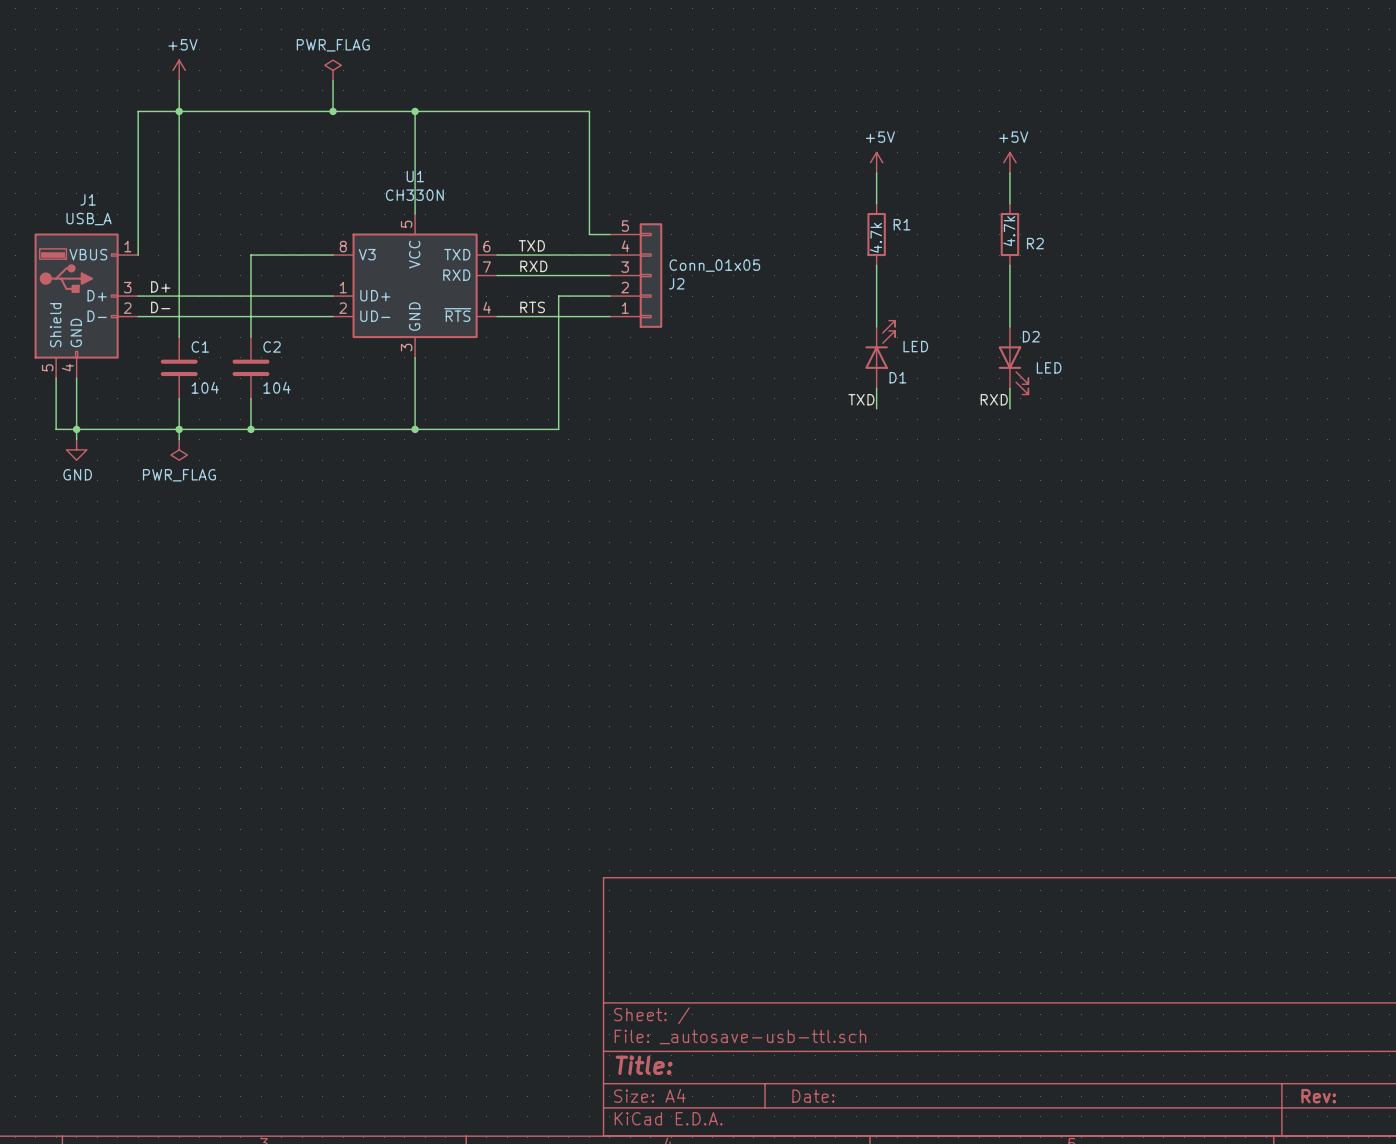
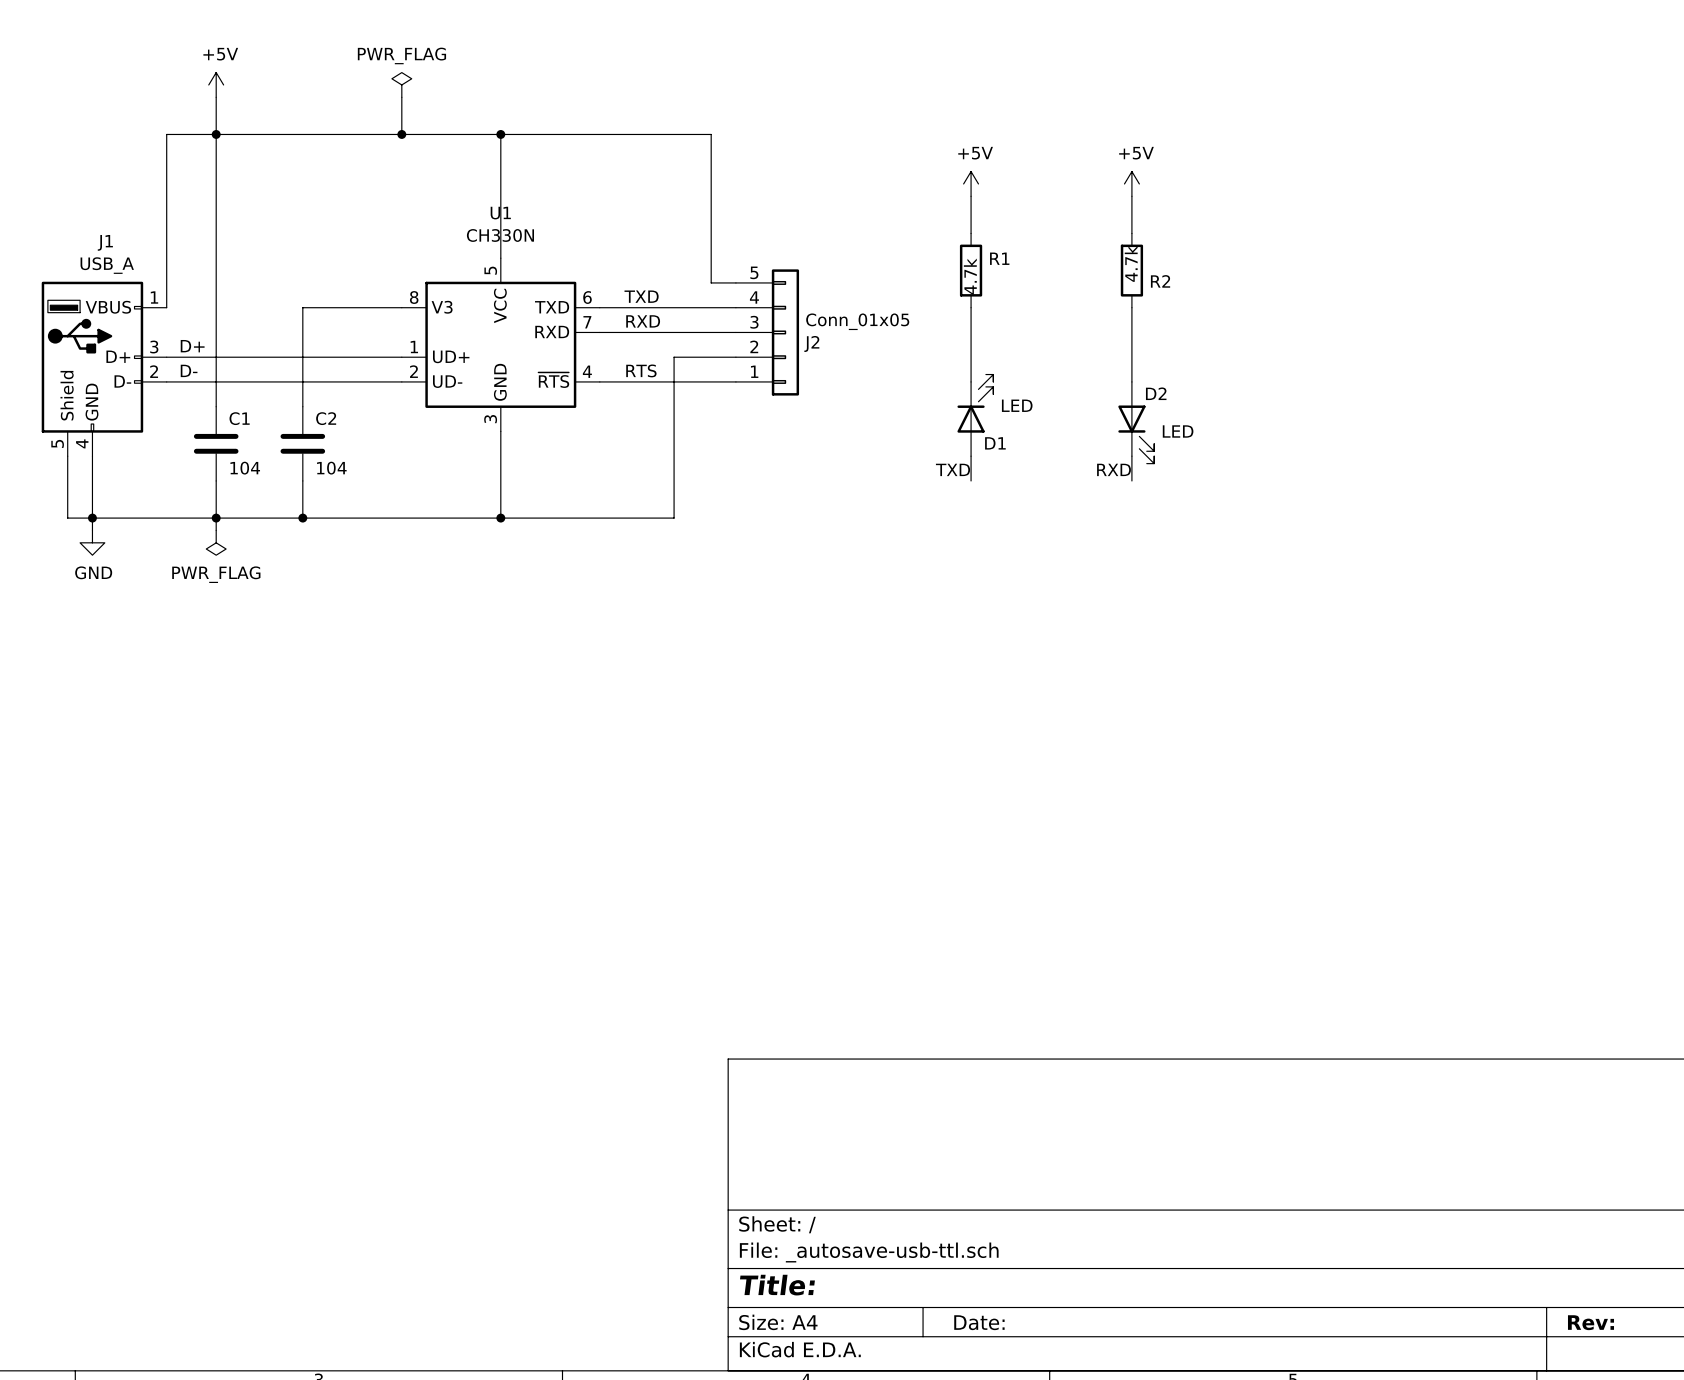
power symbol: none -> +5V (971, 183)
power symbol: none -> +5V (1131, 183)
power symbol: +5V (876, 162) -> none
power symbol: +5V (1009, 162) -> none
wire: (876, 172) (876, 203) -> (971, 196) (971, 233)
wire: (1009, 172) (1009, 203) -> (1131, 196) (1131, 233)
R1 position: (876, 234) -> (971, 270)
R2 position: (1009, 234) -> (1131, 270)
wire: (876, 265) (876, 326) -> (971, 307) (971, 381)
wire: (1009, 265) (1009, 326) -> (1131, 307) (1131, 381)
D1 position: (880, 354) -> (975, 415)
D2 position: (1013, 360) -> (1136, 422)
wire: (876, 388) (876, 408) -> (971, 456) (971, 480)
wire: (1009, 388) (1009, 408) -> (1131, 456) (1131, 480)
label position: TXD (861, 399) -> TXD (952, 469)
label position: RXD (994, 399) -> RXD (1114, 469)

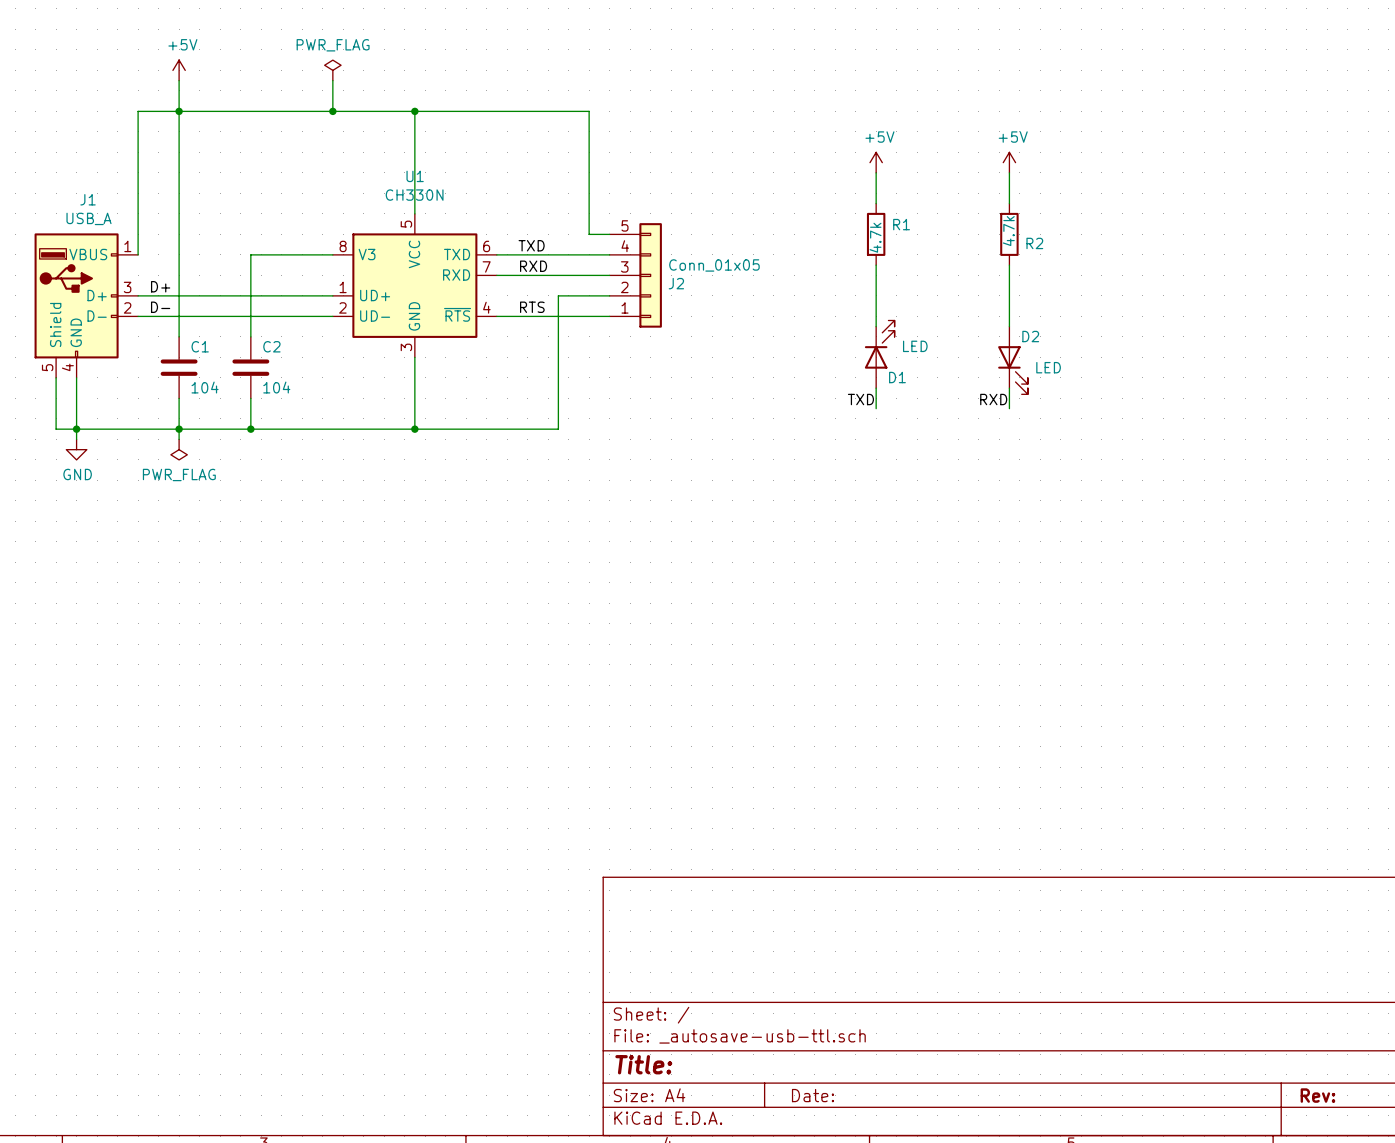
power symbol: +5V (971, 183) -> none
power symbol: +5V (1131, 183) -> none
wire: (971, 196) (971, 233) -> (876, 172) (876, 203)
power symbol: none -> +5V (876, 162)
wire: (1131, 196) (1131, 233) -> (1009, 172) (1009, 203)
power symbol: none -> +5V (1009, 162)
R1 position: (971, 270) -> (876, 234)
R2 position: (1131, 270) -> (1009, 234)
wire: (971, 307) (971, 381) -> (876, 265) (876, 326)
wire: (1131, 307) (1131, 381) -> (1009, 265) (1009, 326)
D1 position: (975, 415) -> (879, 354)
D2 position: (1136, 422) -> (1013, 360)
wire: (971, 456) (971, 480) -> (876, 388) (876, 408)
wire: (1131, 456) (1131, 480) -> (1009, 388) (1009, 408)
label position: TXD (952, 469) -> TXD (860, 399)
label position: RXD (1114, 469) -> RXD (993, 399)

